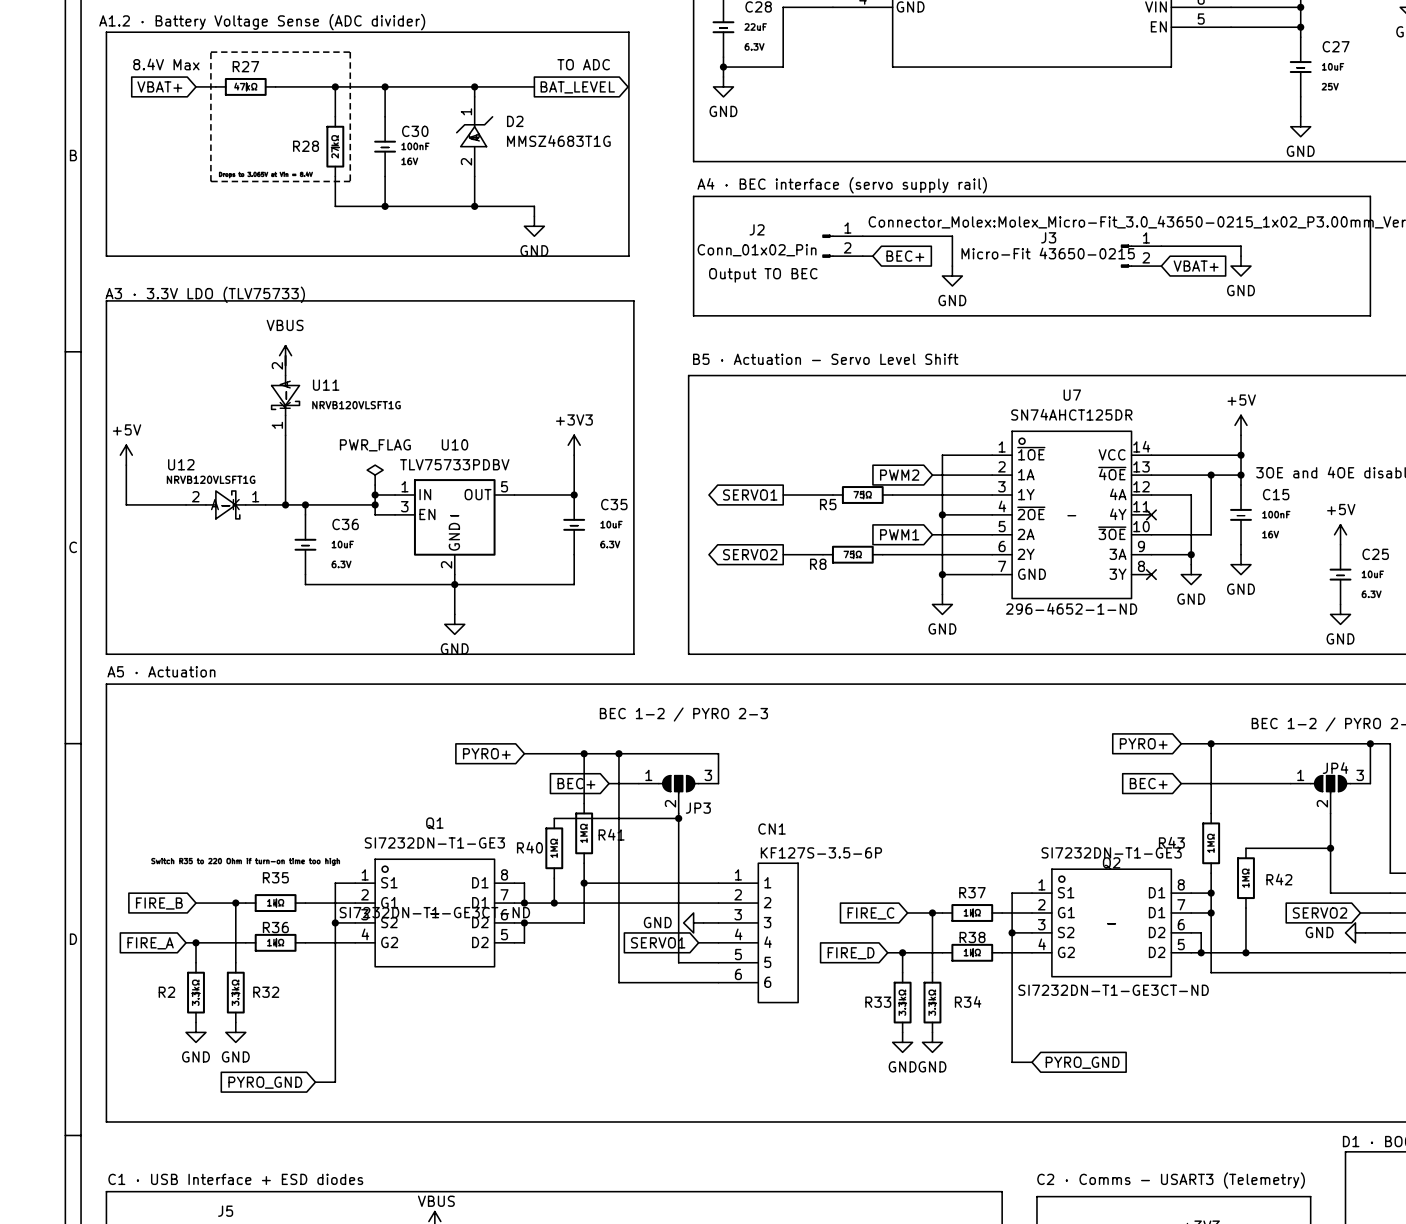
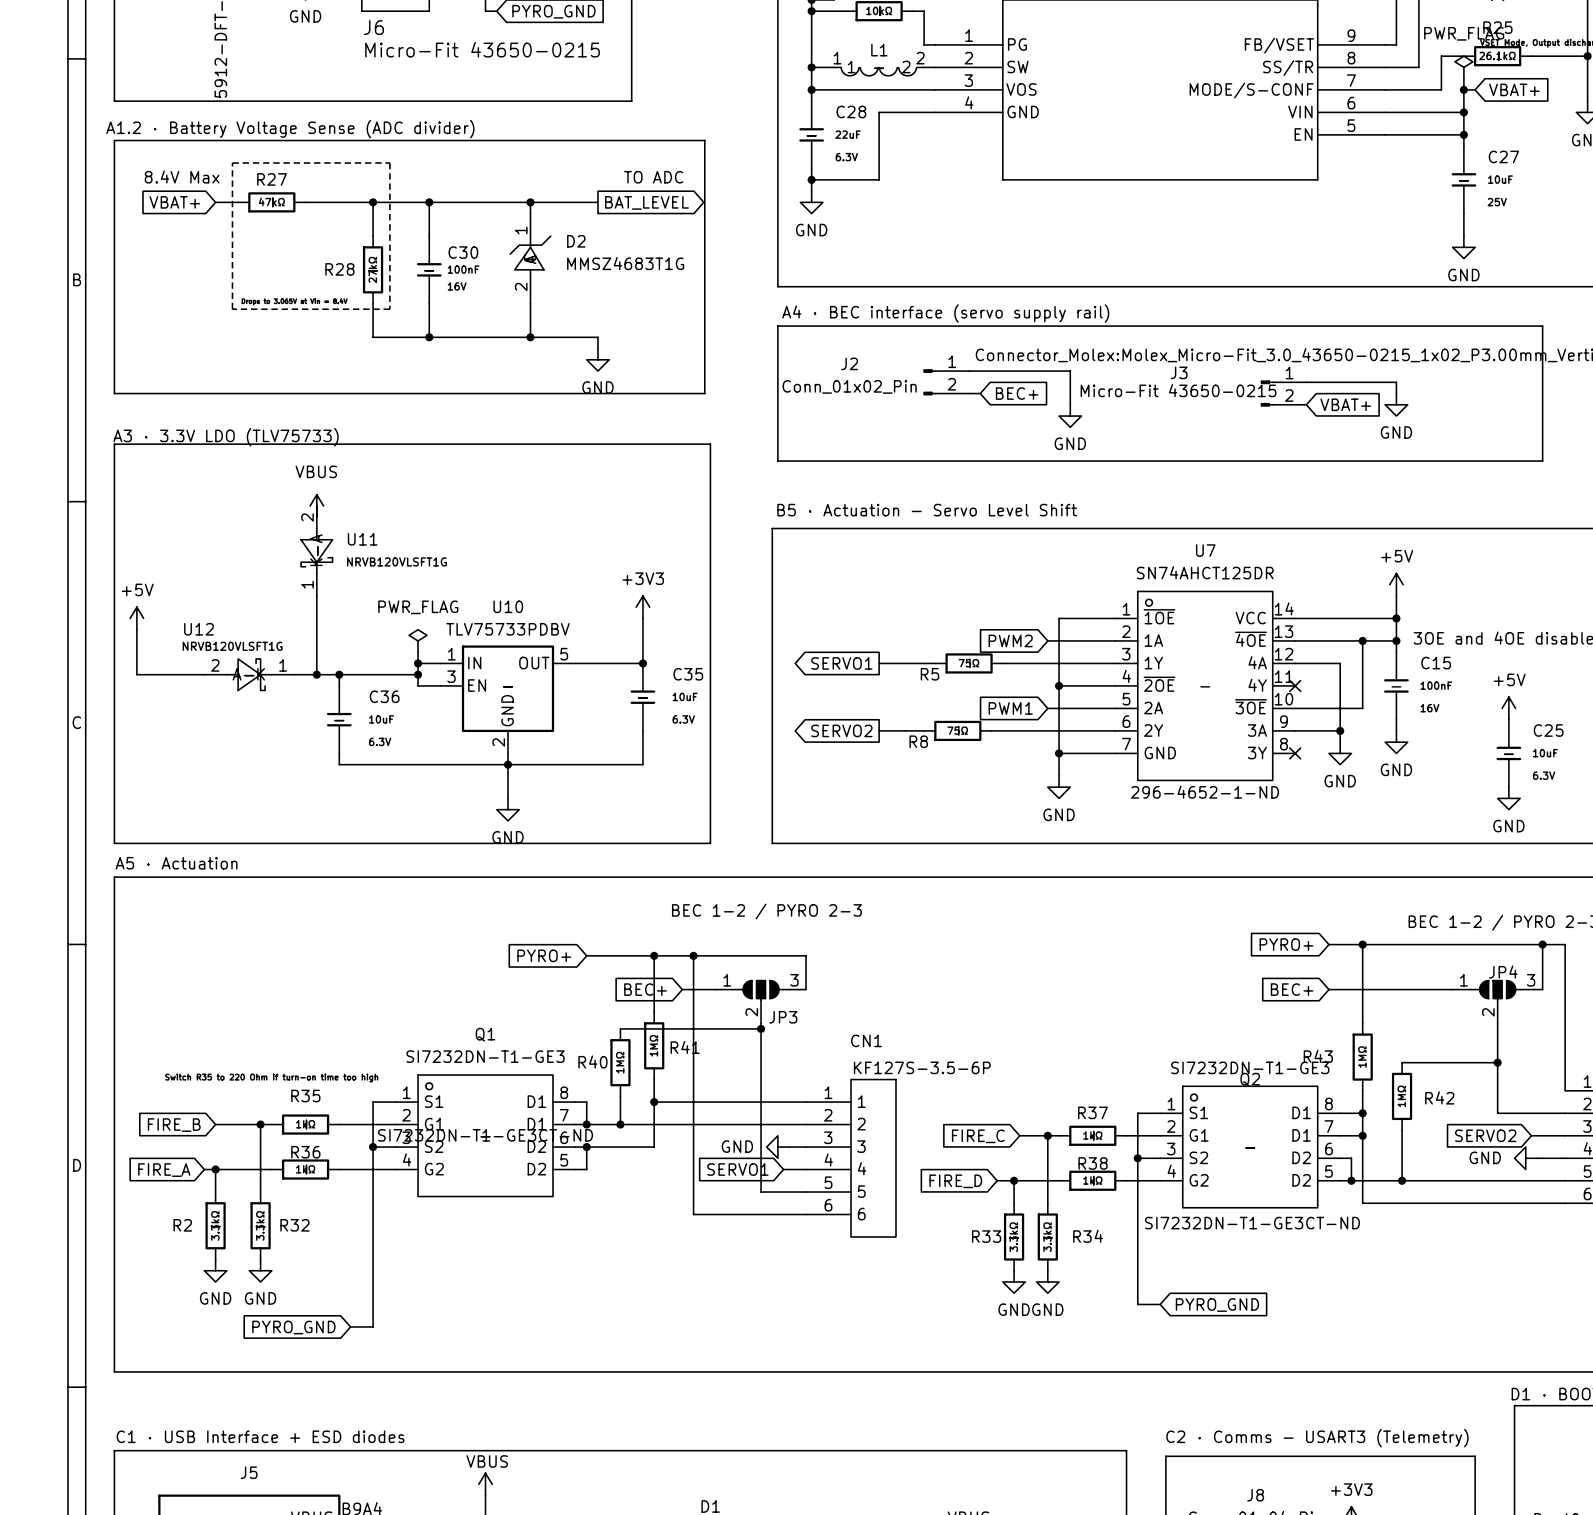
text: Output TO BEC (763, 275) -> none

